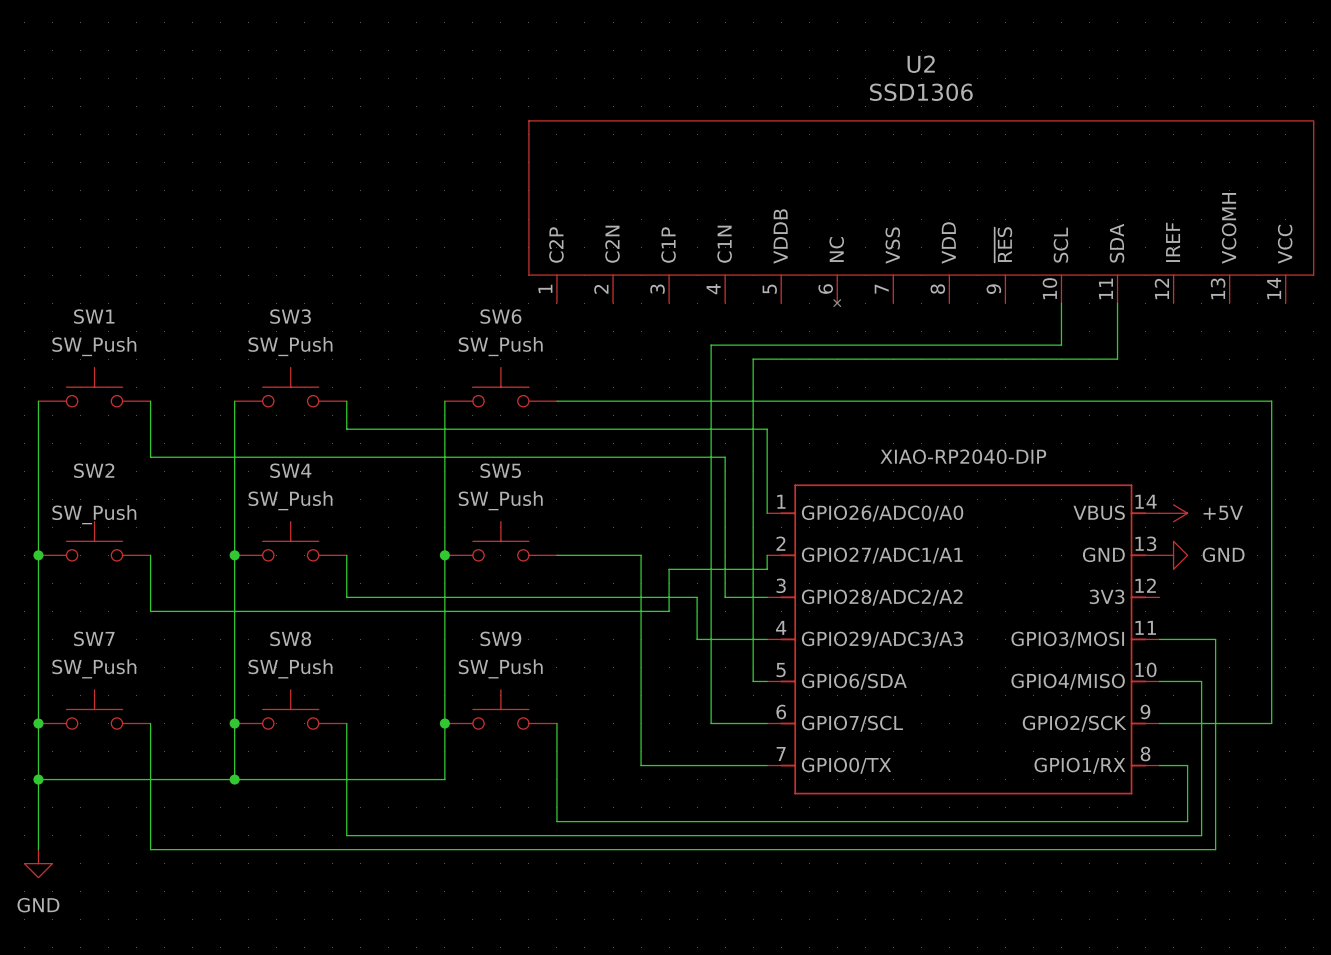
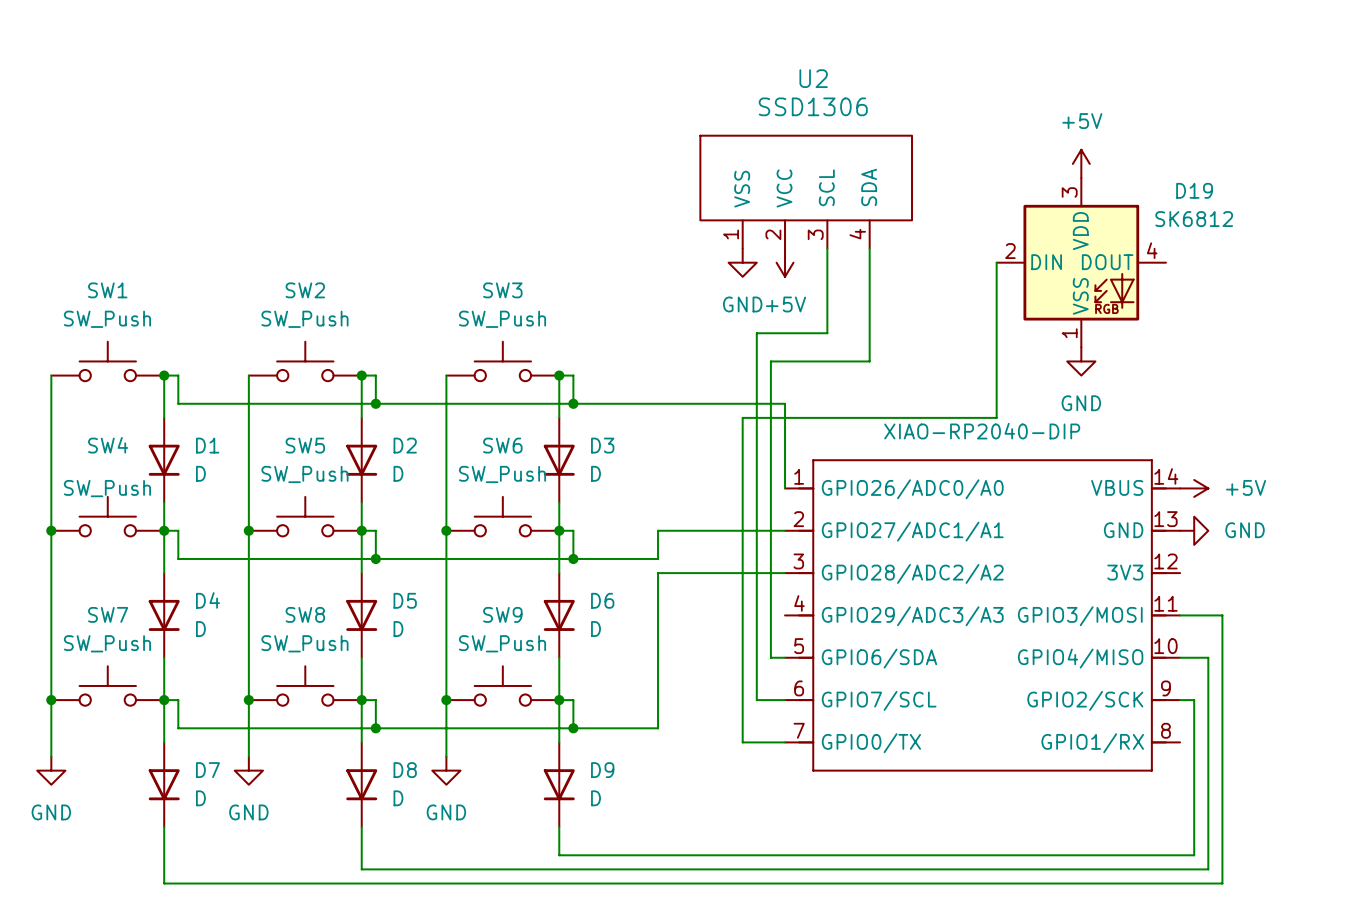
U2 name position: U2 (921, 64) -> U2 (813, 78)
U2 value position: SSD1306 (921, 92) -> SSD1306 (813, 106)
U2 symbol: [528, 120, 1314, 307] -> [700, 135, 913, 249]
power symbol: none -> +5V (1081, 163)
power symbol: none -> GND (742, 262)
power symbol: none -> +5V (785, 262)
D19: none -> SK6812 (1081, 262)
wire: (1061, 303) (1061, 345) (711, 345) (711, 723) (739, 723) -> (770, 333) (756, 333) (756, 700)
wire: (1117, 303) (1117, 359) (809, 359) -> (827, 248) (827, 333)
SW3 name: SW3 (290, 316) -> SW2 (305, 290)
wire: (753, 359) (753, 387) -> (869, 248) (869, 361) (770, 361)
SW3: none -> SW_Push (502, 361)
SW6 position: (500, 387) -> (502, 516)
power symbol: none -> GND (1081, 361)
wire: none -> (164, 375) (178, 375) (178, 403) (361, 403) (361, 417)
junction: none -> (164, 375)
wire: none -> (361, 375) (375, 375) (375, 403)
junction: none -> (361, 375)
wire: none -> (446, 375) (446, 756)
wire: (444, 401) (444, 779) (38, 779) (38, 849) -> none
junction: none -> (559, 375)
wire: (556, 401) (1271, 401) (1271, 723) (1173, 723) -> (559, 827) (559, 855) (1194, 855) (1194, 700)
junction: none -> (375, 403)
wire: none -> (573, 403) (573, 375) (559, 375) (559, 417)
junction: none -> (573, 403)
wire: (150, 443) (150, 457) (725, 457) -> (996, 262) (996, 417) (742, 417) (742, 432)
SW2 name: SW2 (94, 470) -> SW4 (108, 445)
SW4 name: SW4 (290, 470) -> SW5 (305, 445)
D1: none -> D (164, 460)
D2: none -> D (361, 460)
D3: none -> D (559, 460)
wire: none -> (361, 502) (361, 530) (375, 530) (375, 558)
wire: none -> (559, 502) (559, 573)
SW5: SW_Push (500, 541) -> none
junction: none -> (164, 530)
junction: none -> (361, 530)
junction position: (444, 555) -> (446, 530)
wire: none -> (559, 530) (573, 530) (573, 558)
junction: none -> (559, 530)
wire: (556, 555) (641, 555) -> (785, 530) (658, 530)
wire: (767, 555) (767, 569) (669, 569) (669, 611) (150, 611) (150, 597) -> none
junction: none -> (375, 558)
junction: none -> (573, 558)
wire: (641, 583) (641, 597) (346, 597) -> (658, 558) (178, 558) (178, 530) (164, 530) (164, 502)
wire: (697, 597) (697, 639) (767, 639) -> (714, 573) (742, 573) (742, 742)
D4: none -> D (164, 615)
D5: none -> D (361, 615)
D6: none -> D (559, 615)
wire: (1201, 639) (1215, 639) (1215, 849) (150, 849) (150, 765) -> none
wire: none -> (361, 657) (361, 700) (375, 700) (375, 728)
wire: none -> (559, 657) (559, 742)
wire: (1187, 681) (1201, 681) -> (1222, 615) (1222, 657)
SW9 position: (500, 709) -> (502, 685)
junction: none -> (164, 700)
junction: none -> (361, 700)
junction position: (444, 723) -> (446, 700)
junction: none -> (559, 700)
junction: none -> (375, 728)
wire: (556, 751) (556, 821) (1187, 821) -> (361, 827) (361, 869) (1208, 869) (1208, 798)
junction: none -> (573, 728)
wire: (641, 751) (641, 765) (725, 765) -> (658, 728) (178, 728) (178, 700) (164, 700) (164, 657)
wire: (346, 765) (346, 835) (1201, 835) -> (164, 827) (164, 883) (1222, 883) (1222, 812)
wire: (1159, 765) (1187, 765) -> (1208, 657) (1208, 742)
junction: (38, 779) -> none
junction: (234, 779) -> none
power symbol: none -> GND (248, 770)
power symbol: none -> GND (446, 770)
D7: none -> D (164, 784)
D8: none -> D (361, 784)
D9: none -> D (559, 784)
power symbol position: GND (38, 863) -> GND (51, 770)

